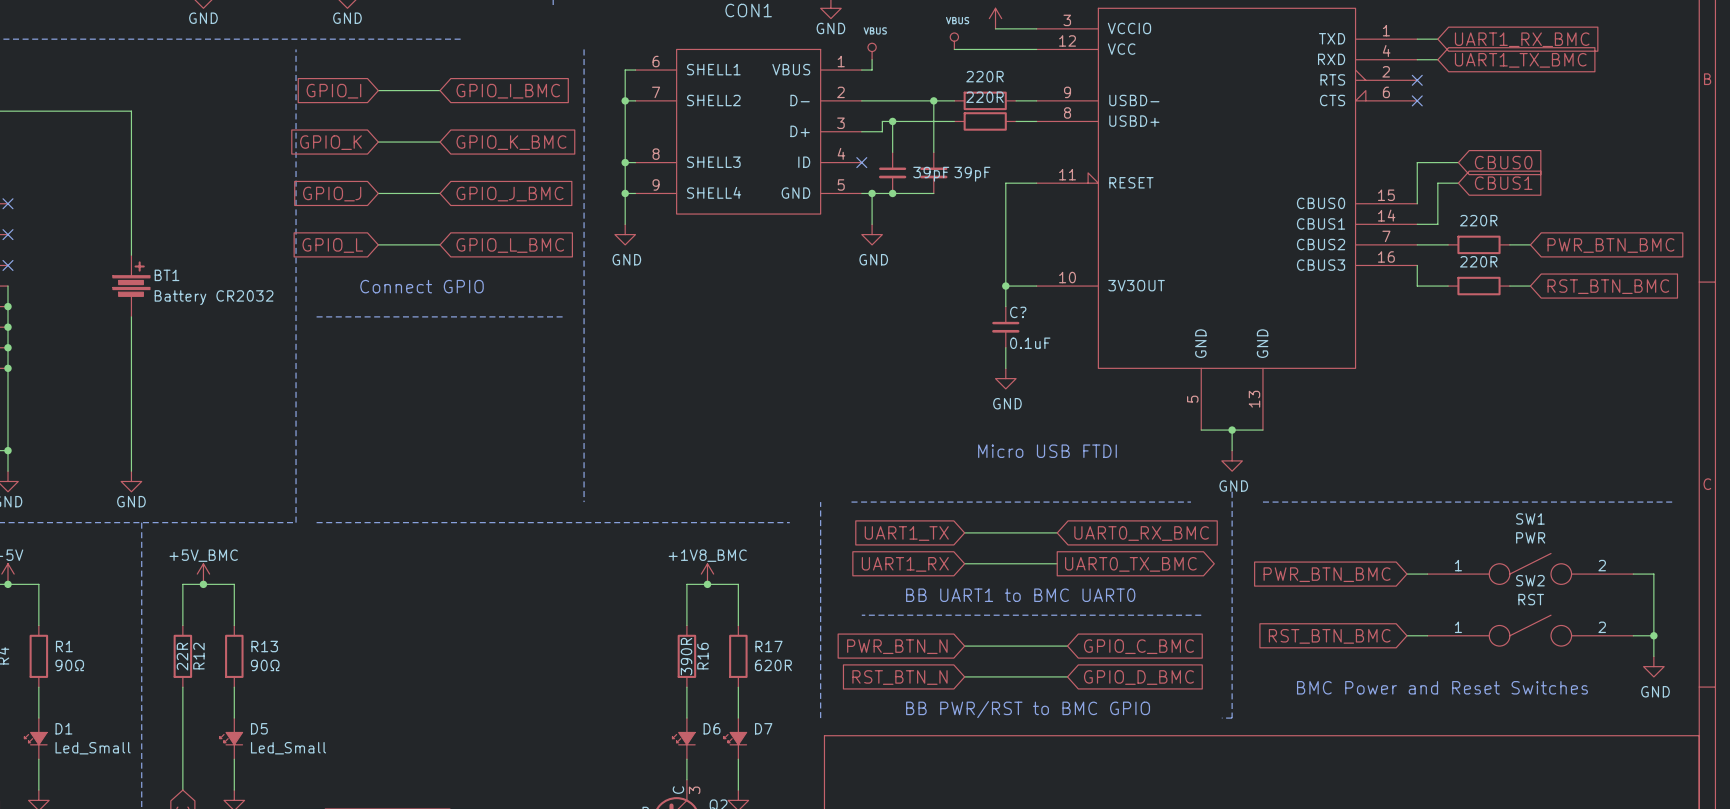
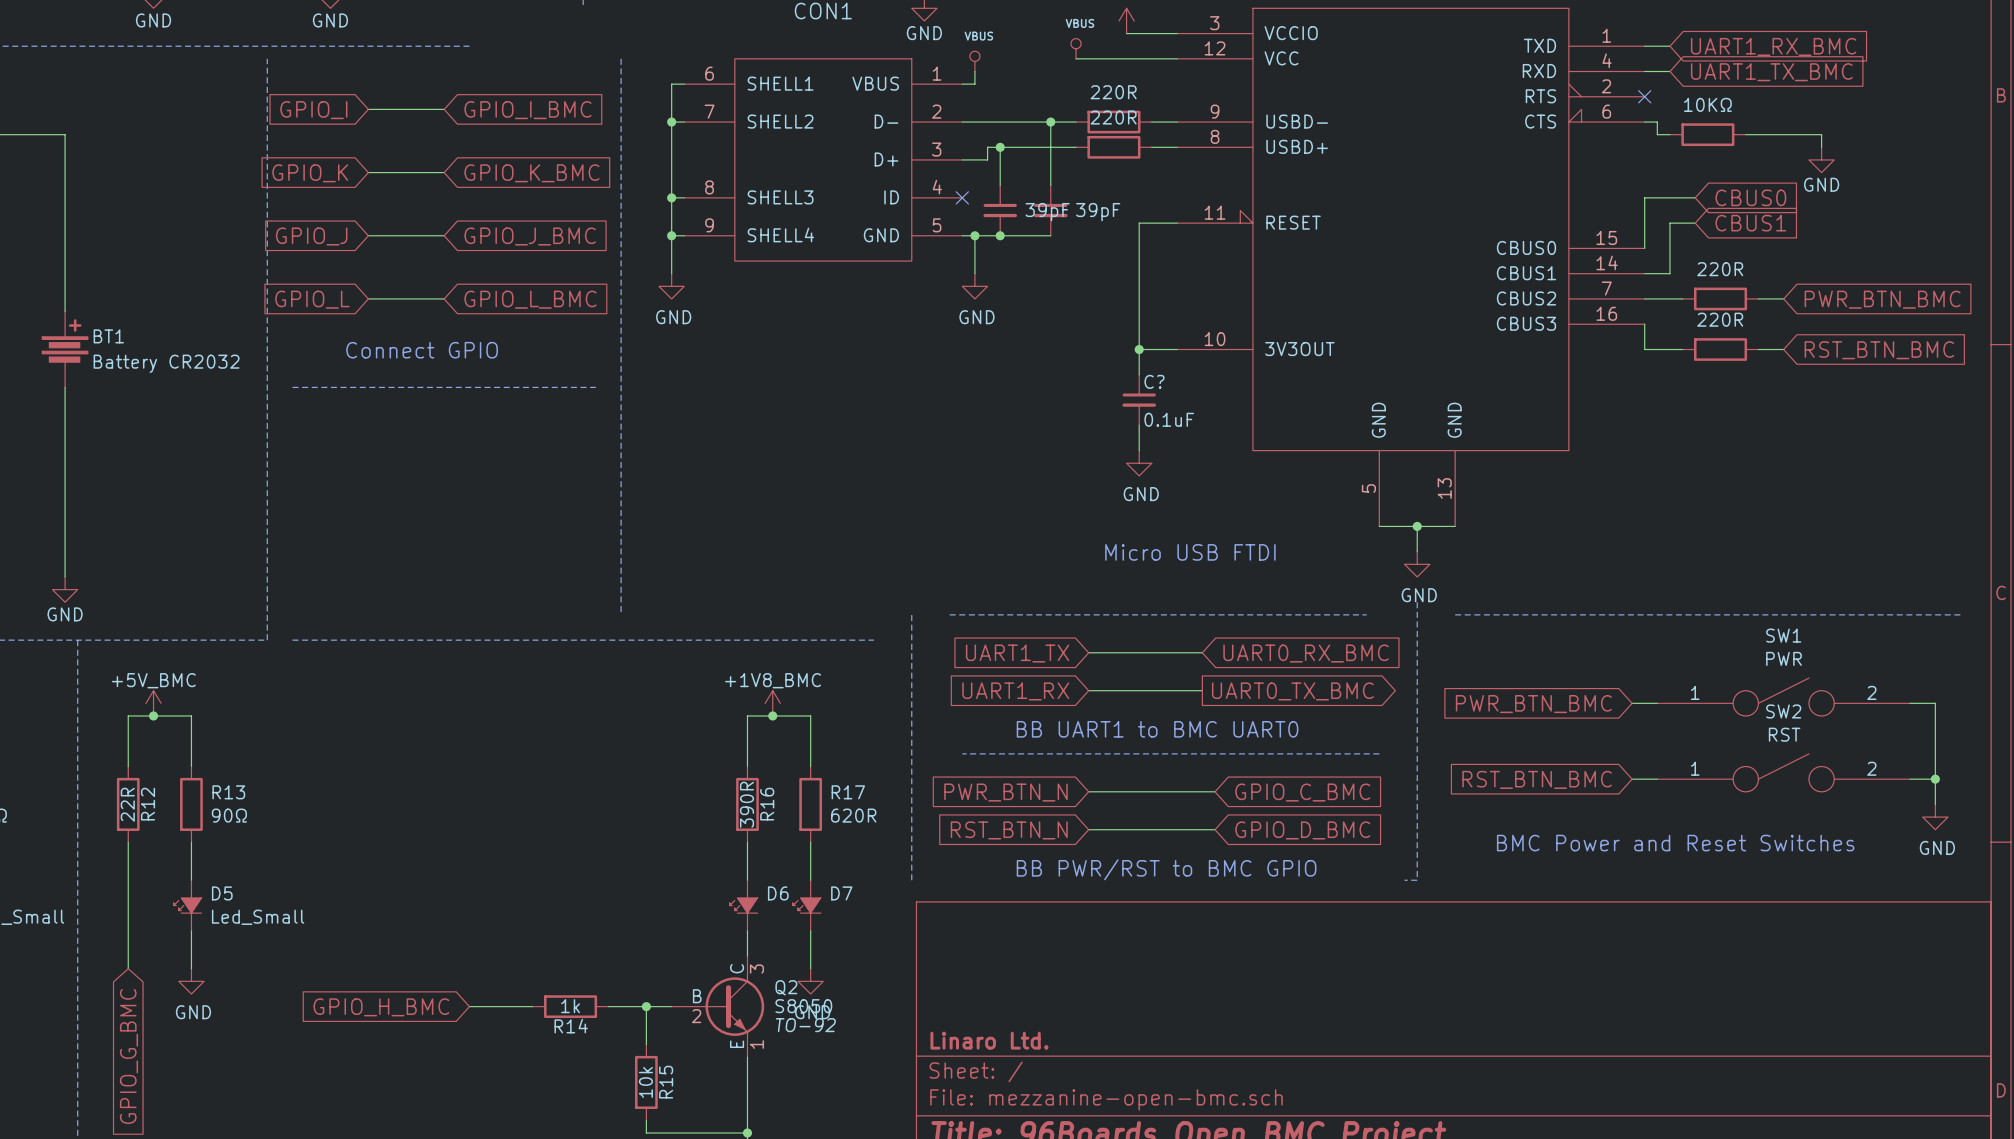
wire: none -> (1644, 122) (1657, 122) (1657, 134) (1669, 134)
no-connect mark: (1417, 100) -> none
part: none -> 10KΩ (1707, 134)
wire: none -> (1745, 134) (1821, 134) (1821, 147)
power symbol: none -> GND (1821, 159)

